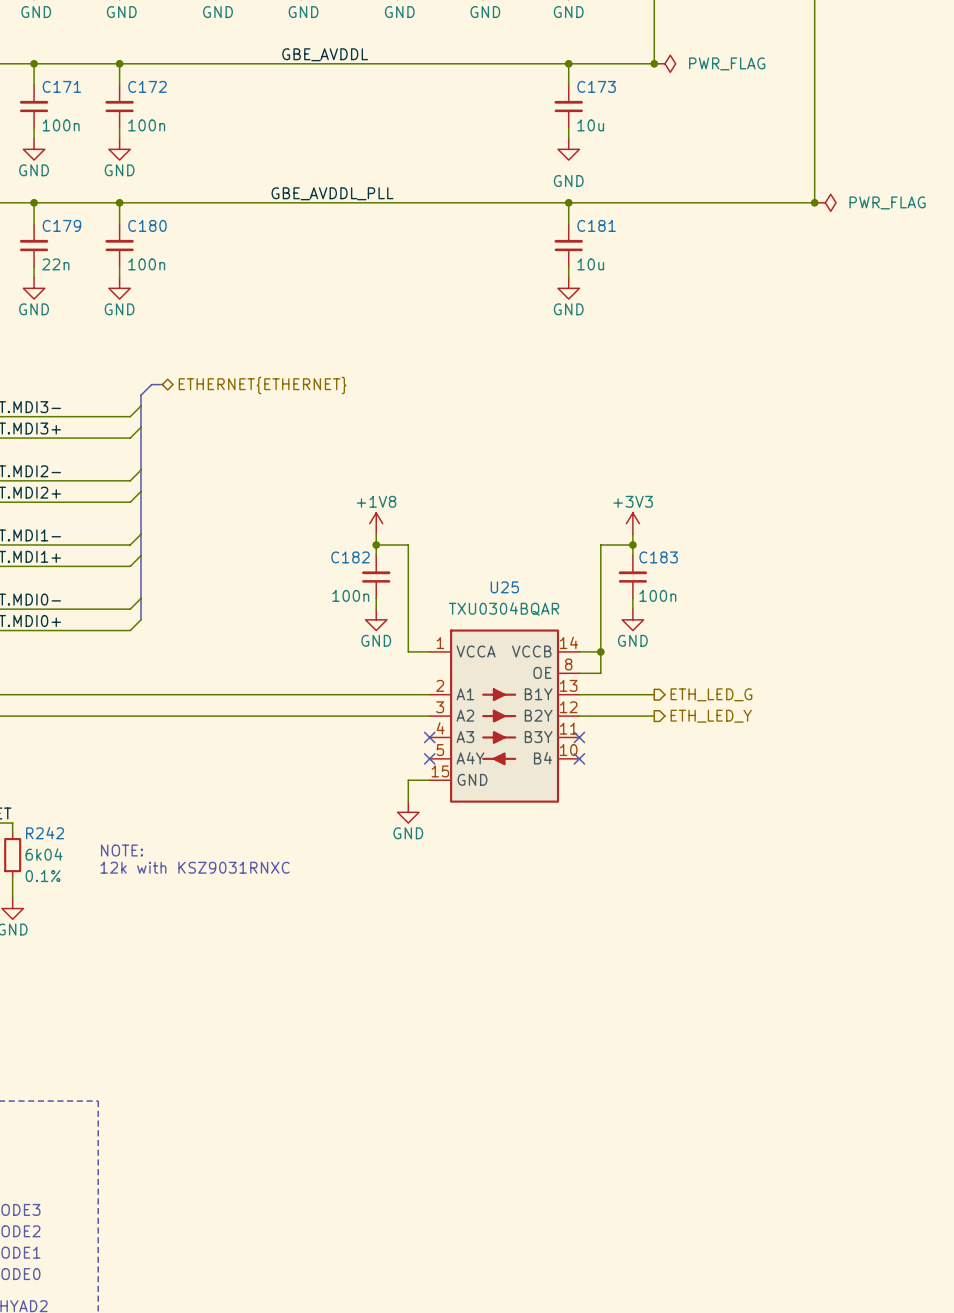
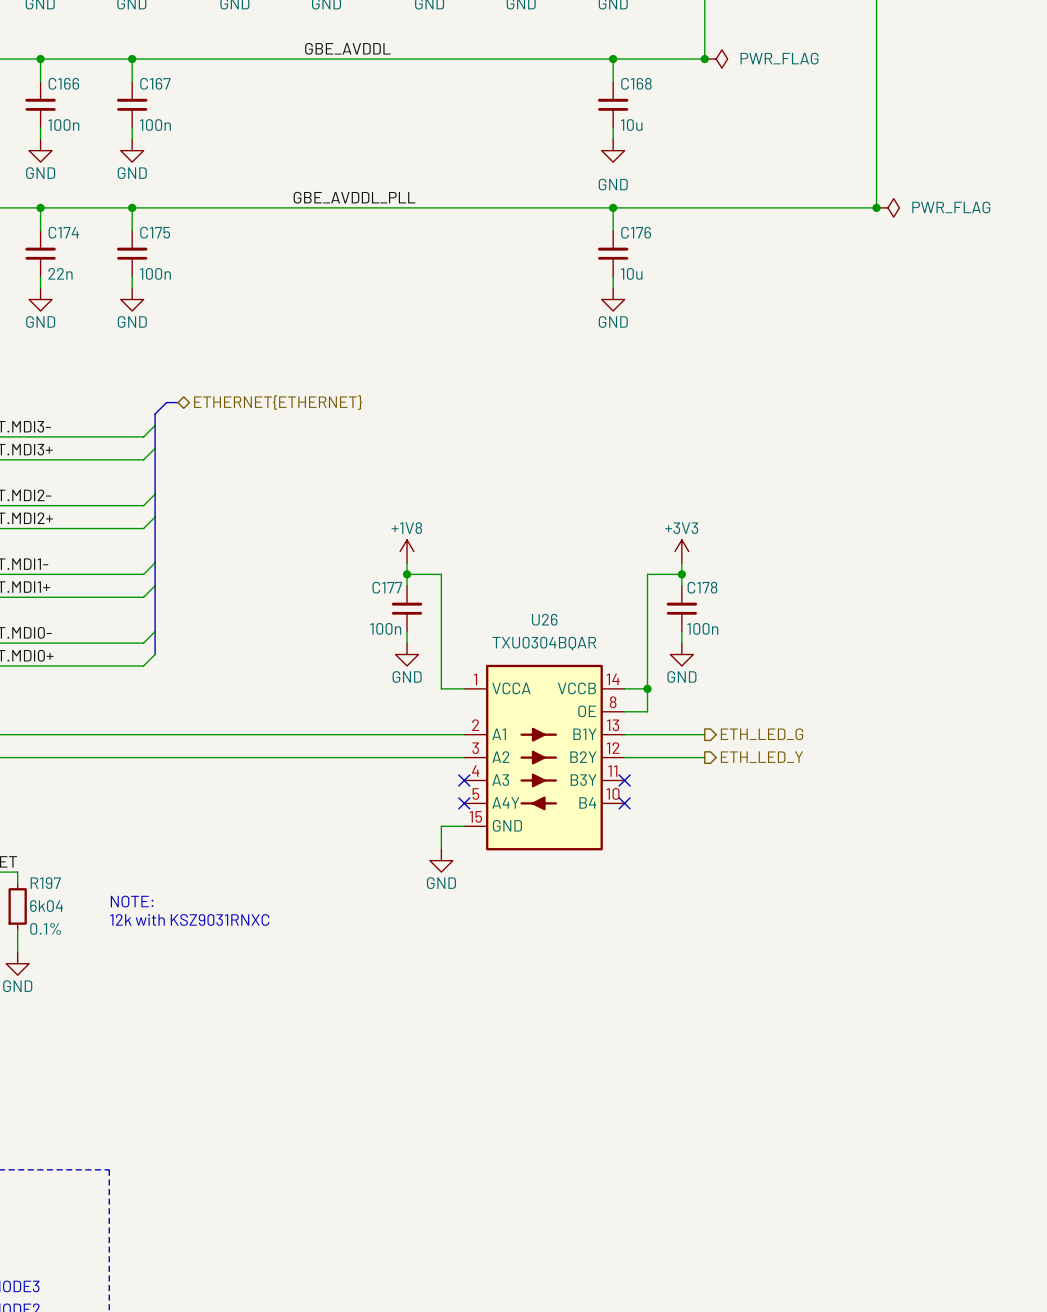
C171 name: C171 (61, 86) -> C166 (63, 83)
C172 name: C172 (147, 86) -> C167 (155, 83)
C173 name: C173 (596, 86) -> C168 (636, 83)
C179 name: C179 (61, 225) -> C174 (63, 232)
C180 name: C180 (147, 225) -> C175 (155, 232)
C181 name: C181 (596, 225) -> C176 (636, 232)
C182 name: C182 (350, 557) -> C177 (387, 587)
C183 name: C183 (658, 557) -> C178 (702, 587)
U25 name: U25 (504, 587) -> U26 (544, 619)
R242 name: R242 (45, 833) -> R197 (45, 883)

